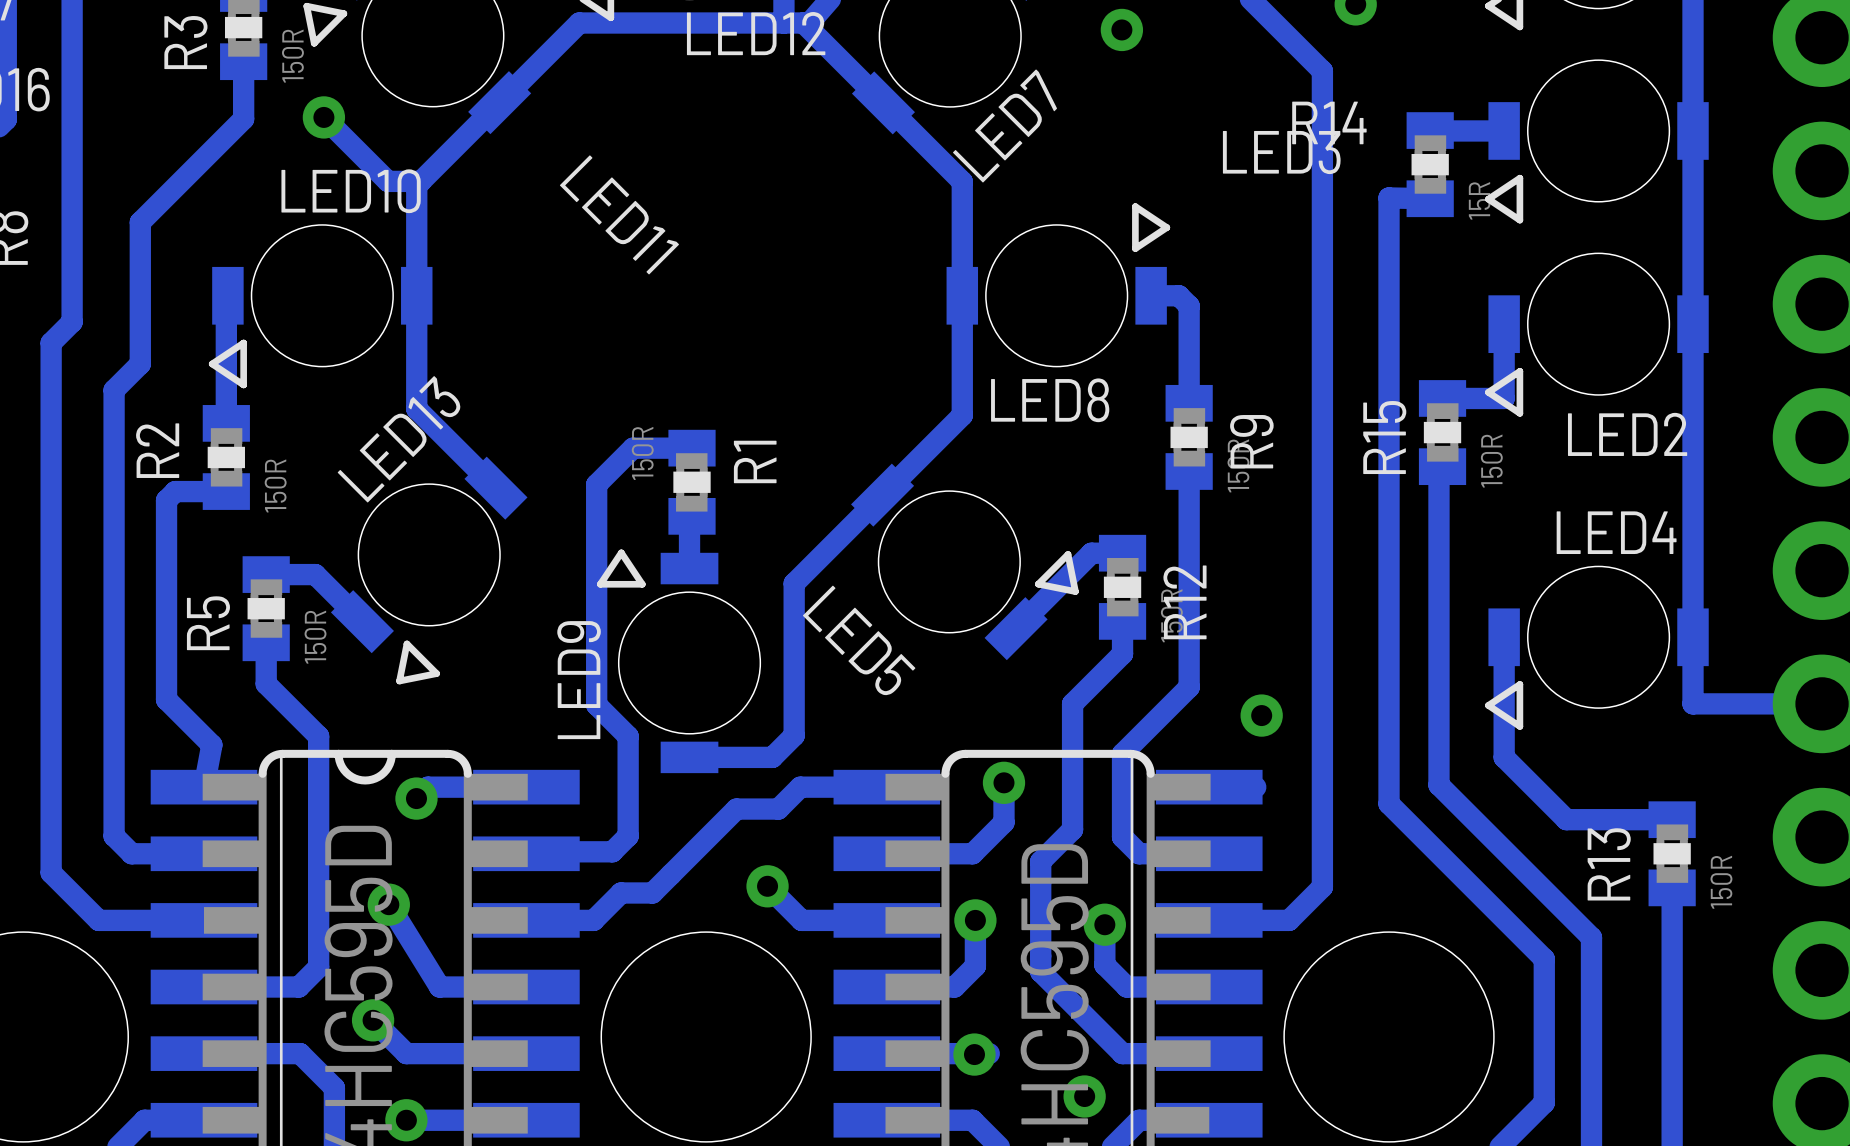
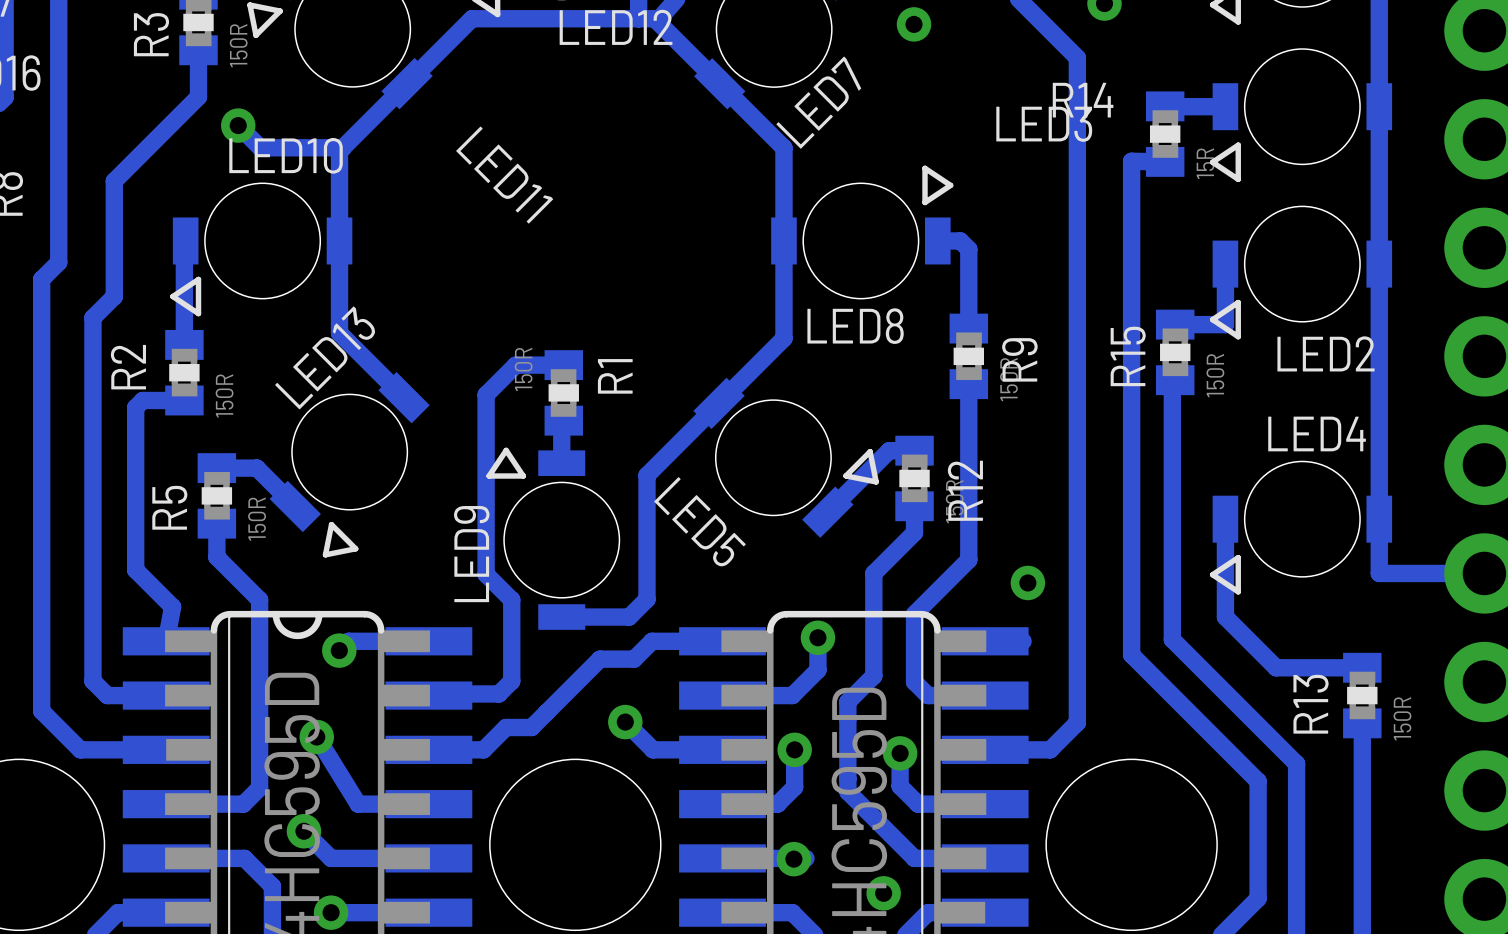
track: (323, 117) (387, 181) -> (238, 125) (260, 147) (315, 147)
via position: (323, 117) -> (238, 125)

